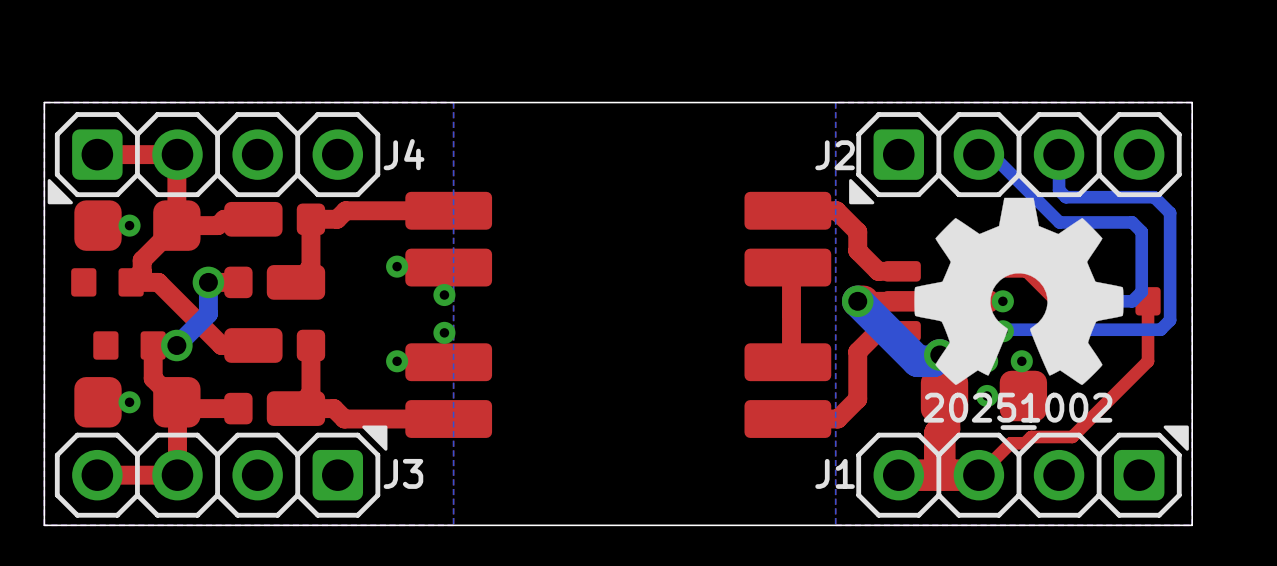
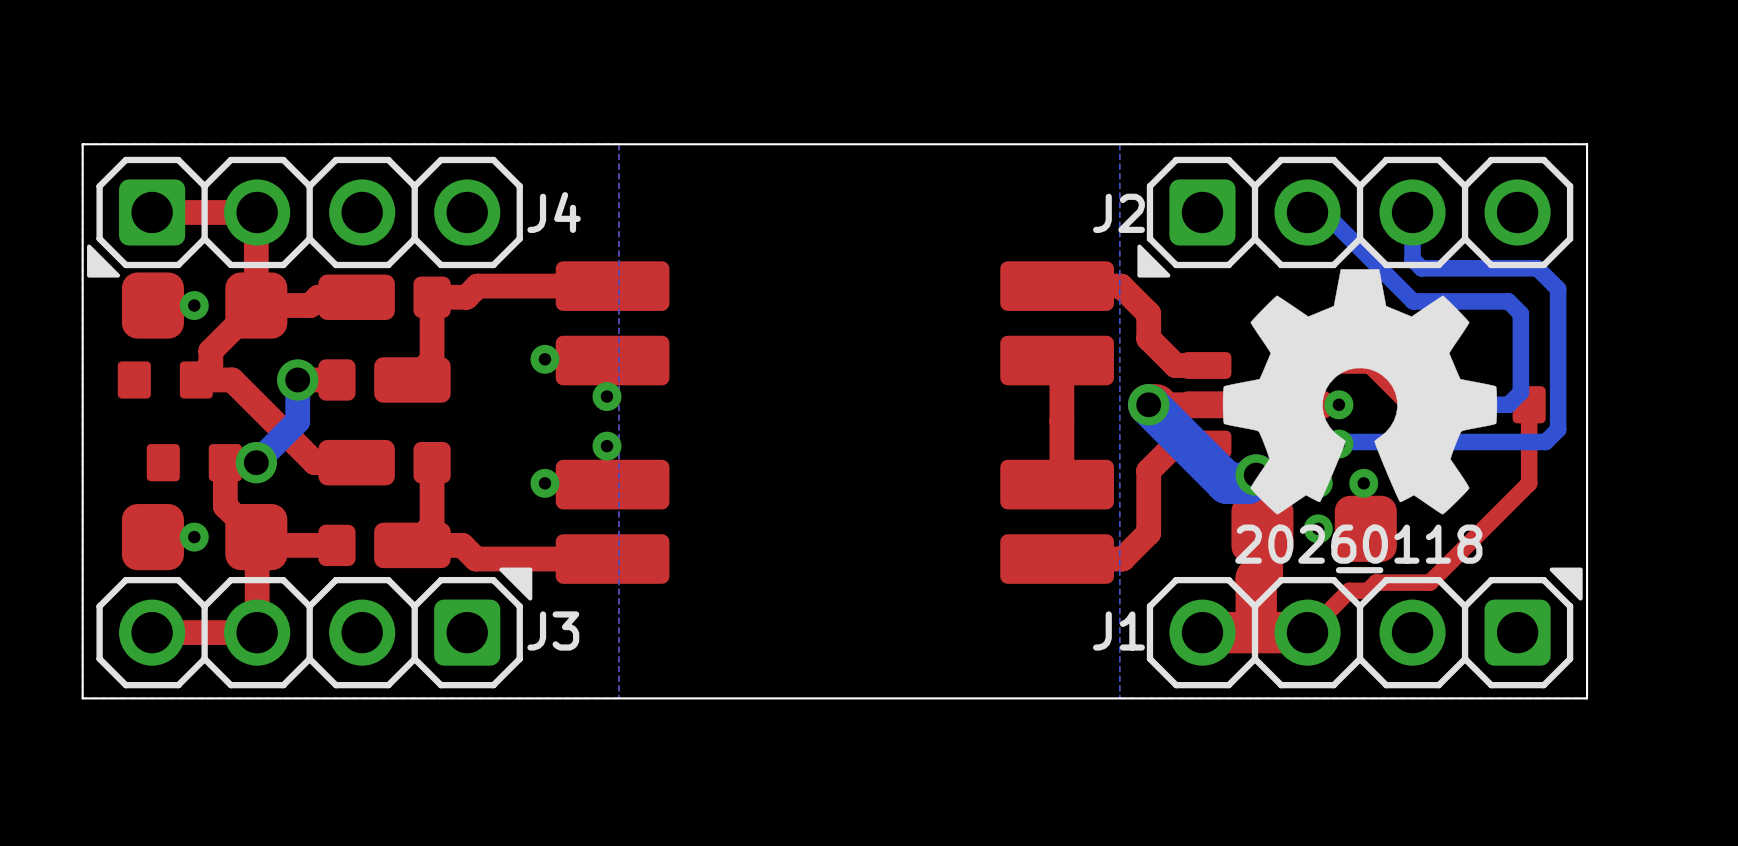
drawing shape: [923, 392, 1113, 430] -> [1235, 524, 1483, 574]

